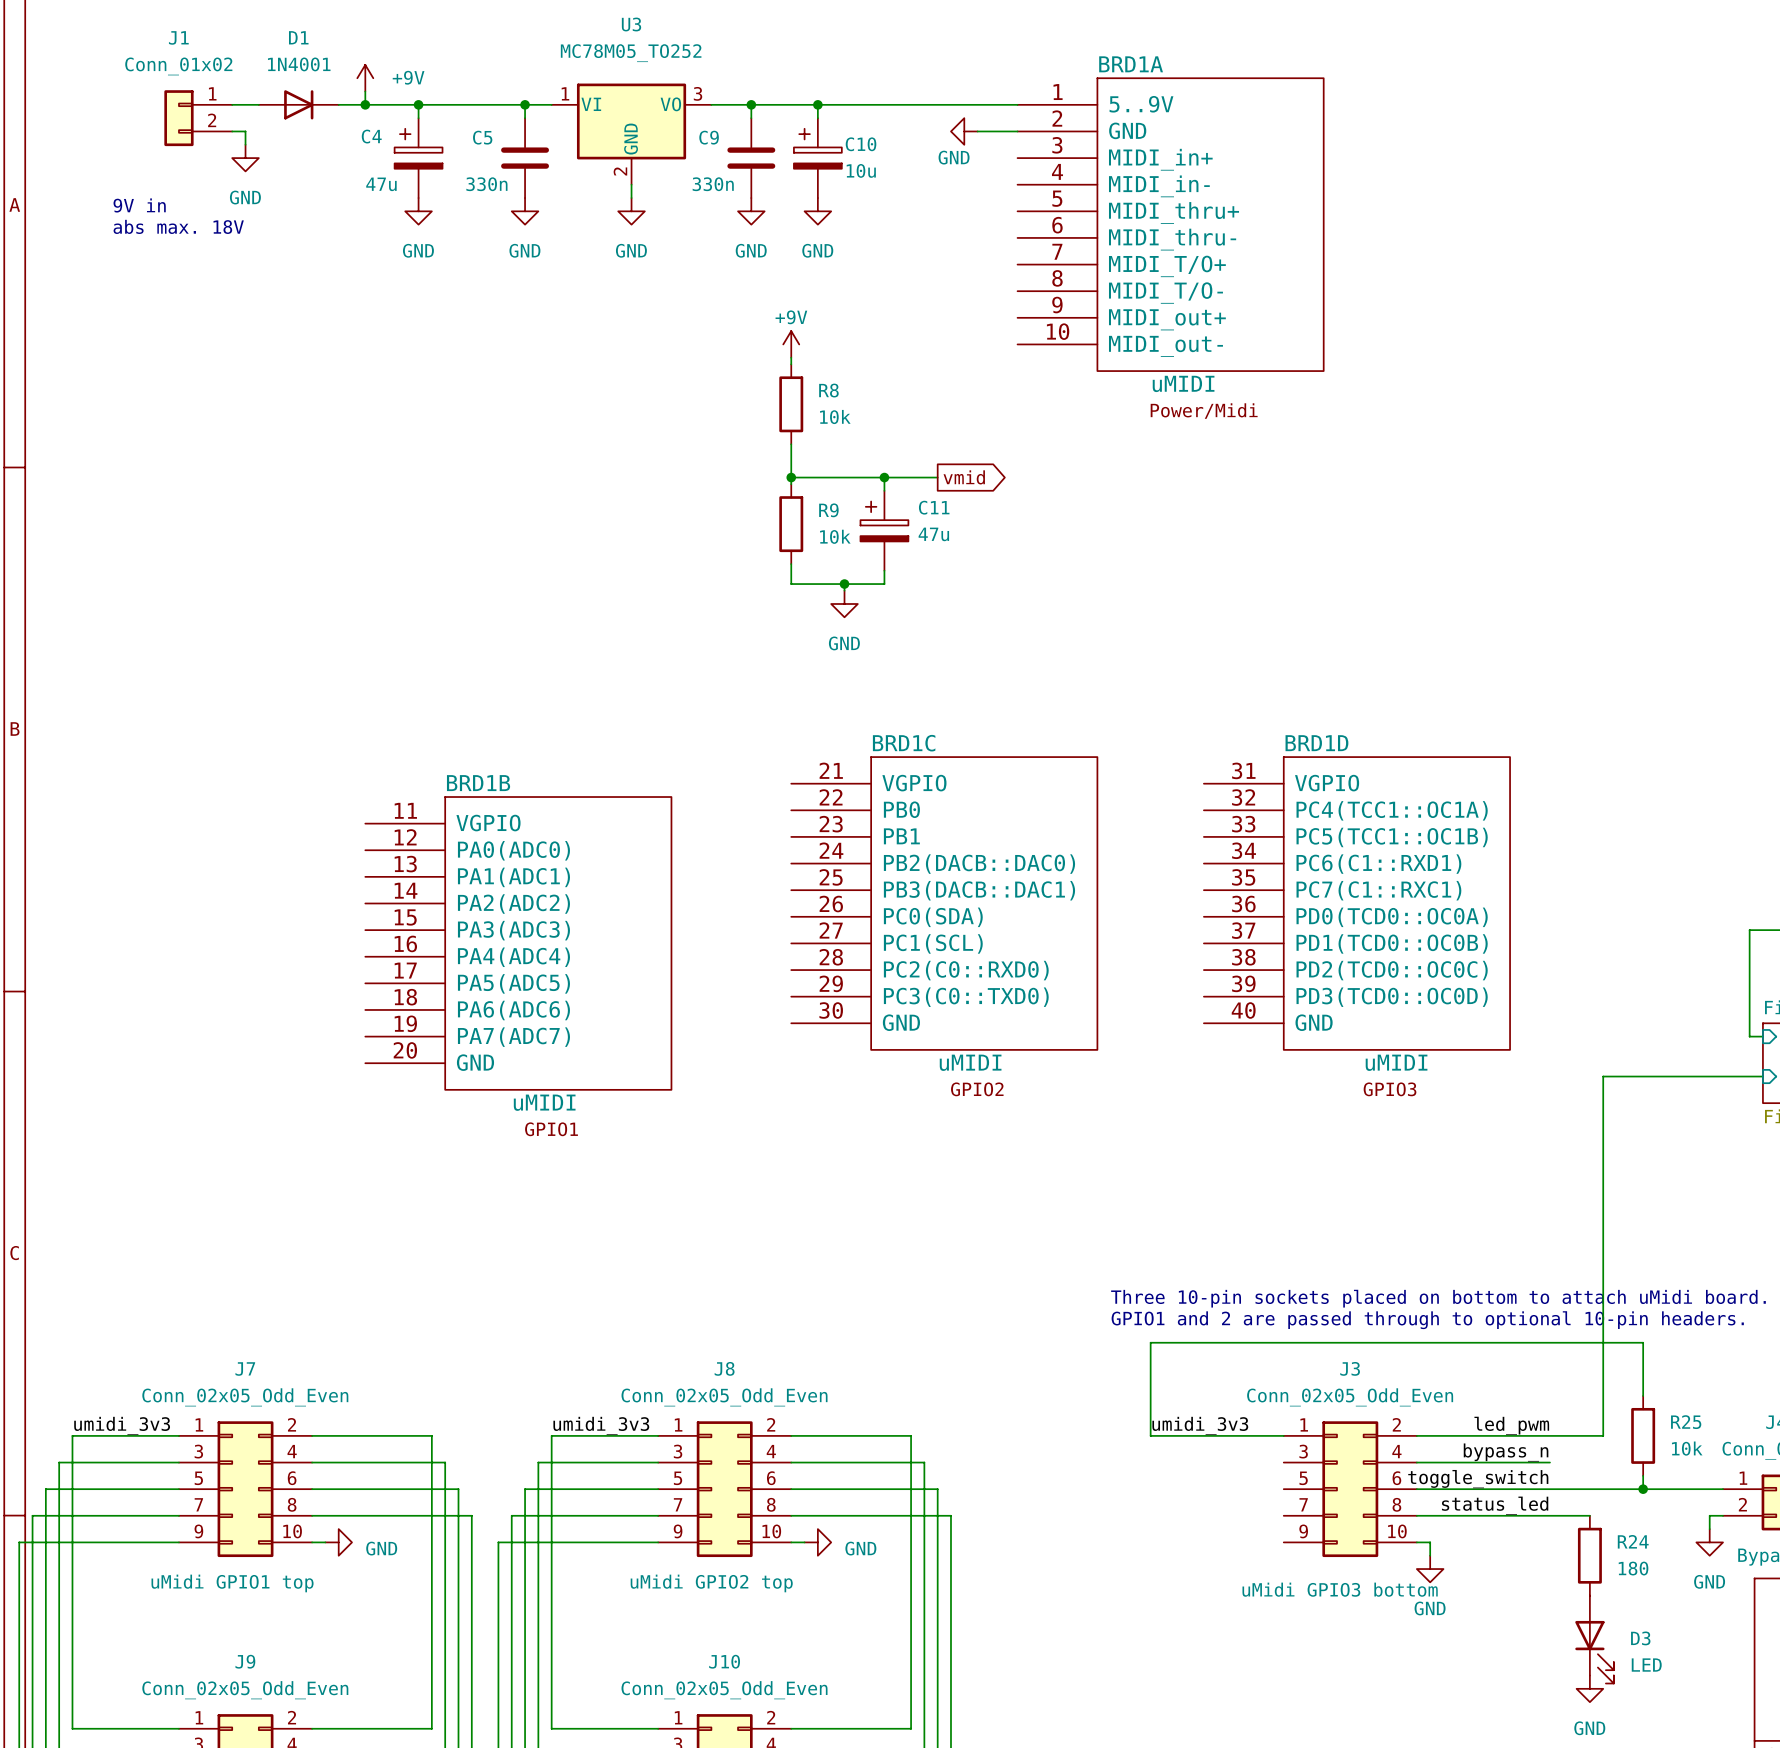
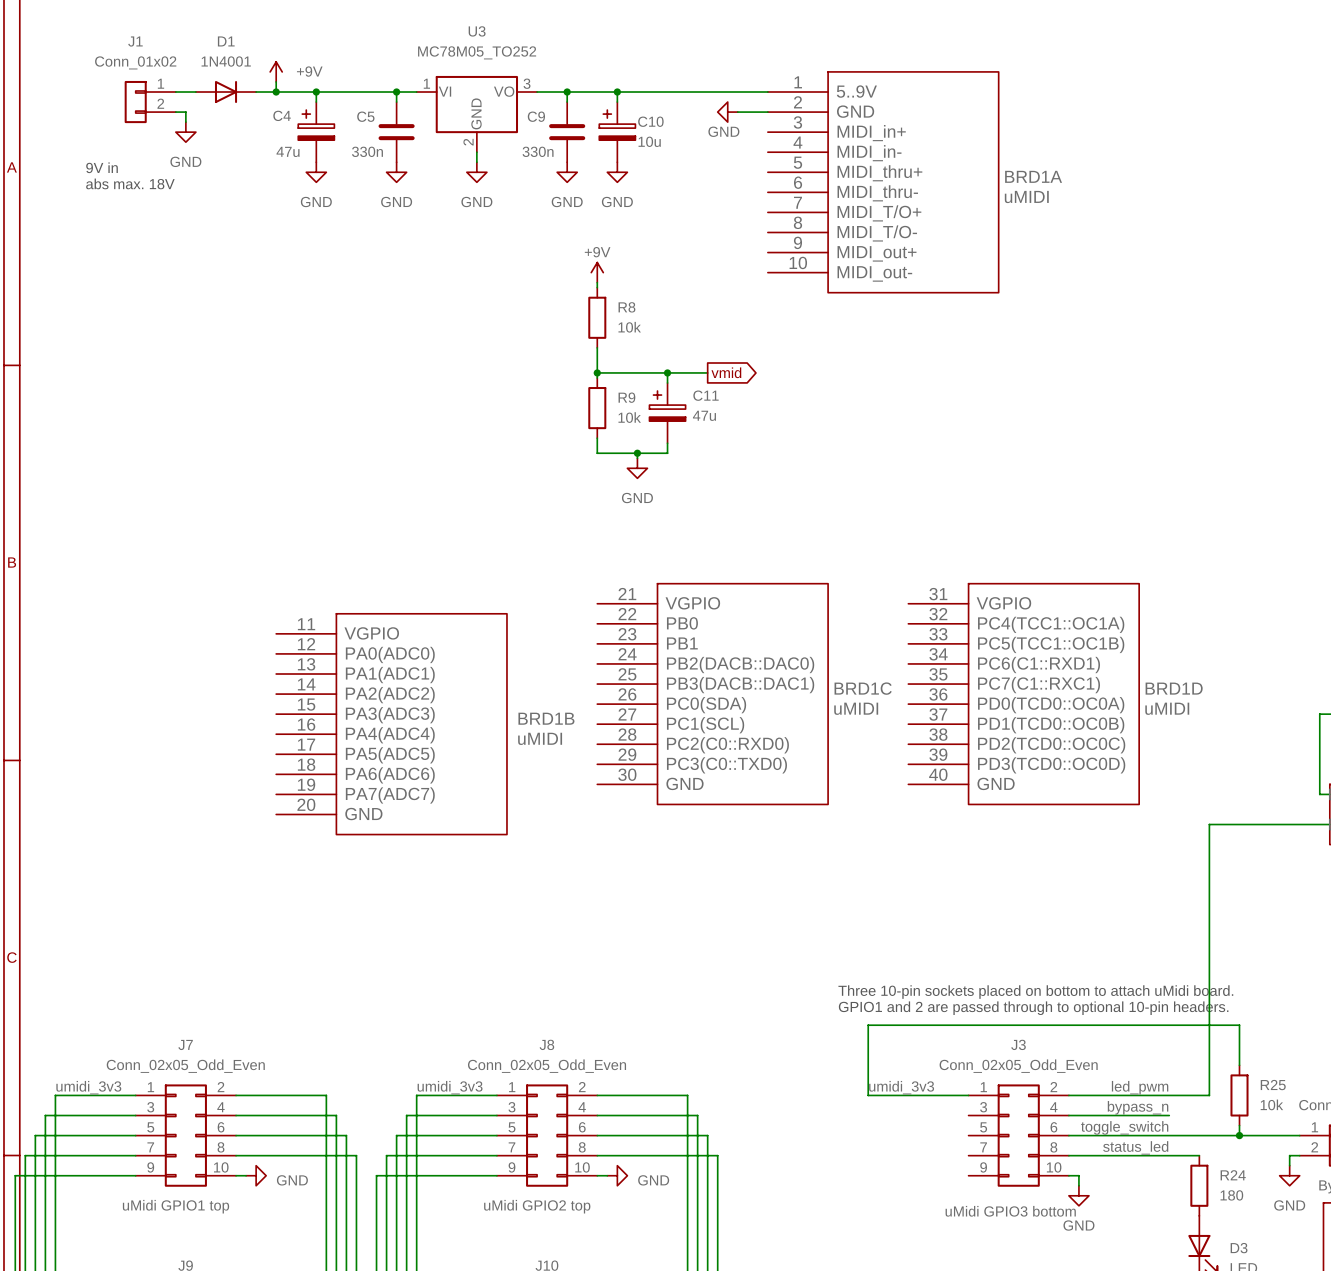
BRD1A name position: BRD1A (1131, 64) -> BRD1A (1033, 176)
BRD1A value position: uMIDI (1183, 383) -> uMIDI (1026, 197)
BRD1A text: Power/Midi (1204, 411) -> none
BRD1C name position: BRD1C (904, 743) -> BRD1C (863, 688)
BRD1D name position: BRD1D (1316, 743) -> BRD1D (1174, 688)
BRD1B name position: BRD1B (478, 783) -> BRD1B (546, 718)
BRD1C value position: uMIDI (970, 1062) -> uMIDI (856, 708)
BRD1D value position: uMIDI (1396, 1062) -> uMIDI (1167, 708)
BRD1C text: GPIO2 (977, 1089) -> none
BRD1D text: GPIO3 (1390, 1089) -> none
BRD1B value position: uMIDI (544, 1102) -> uMIDI (540, 738)
BRD1B text: GPIO1 (551, 1129) -> none

